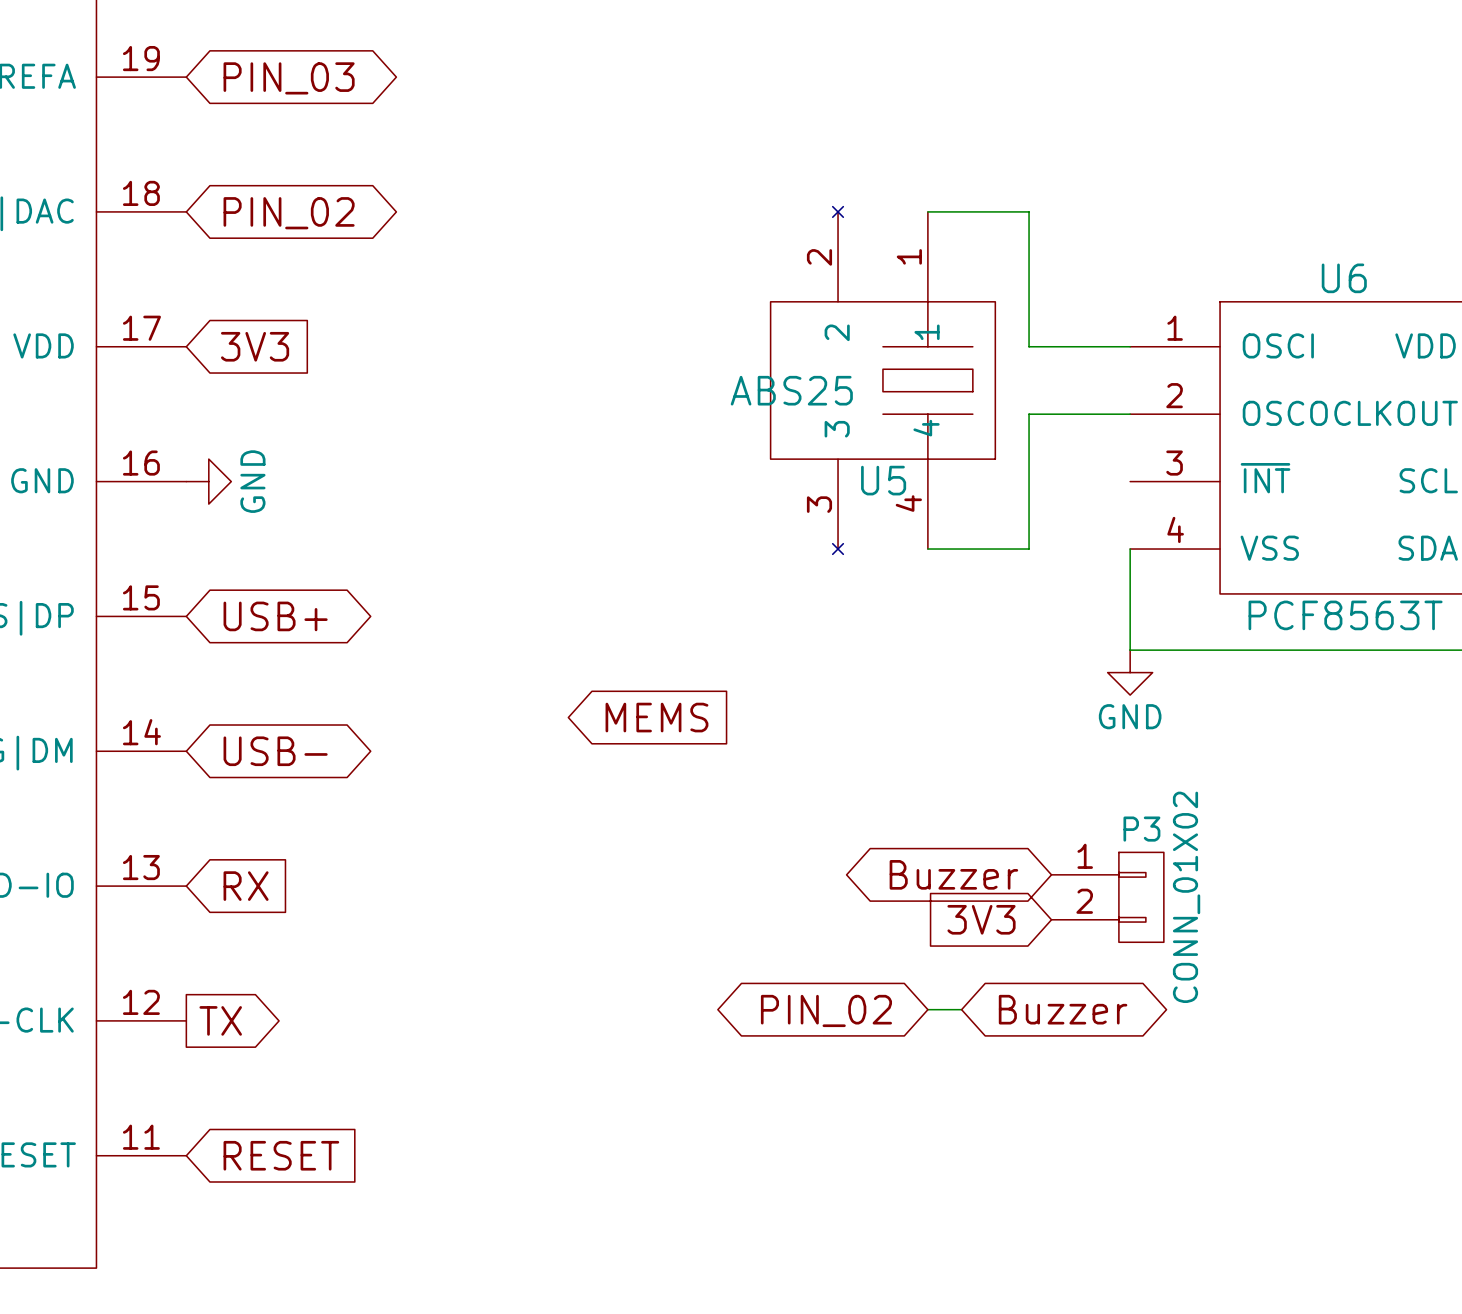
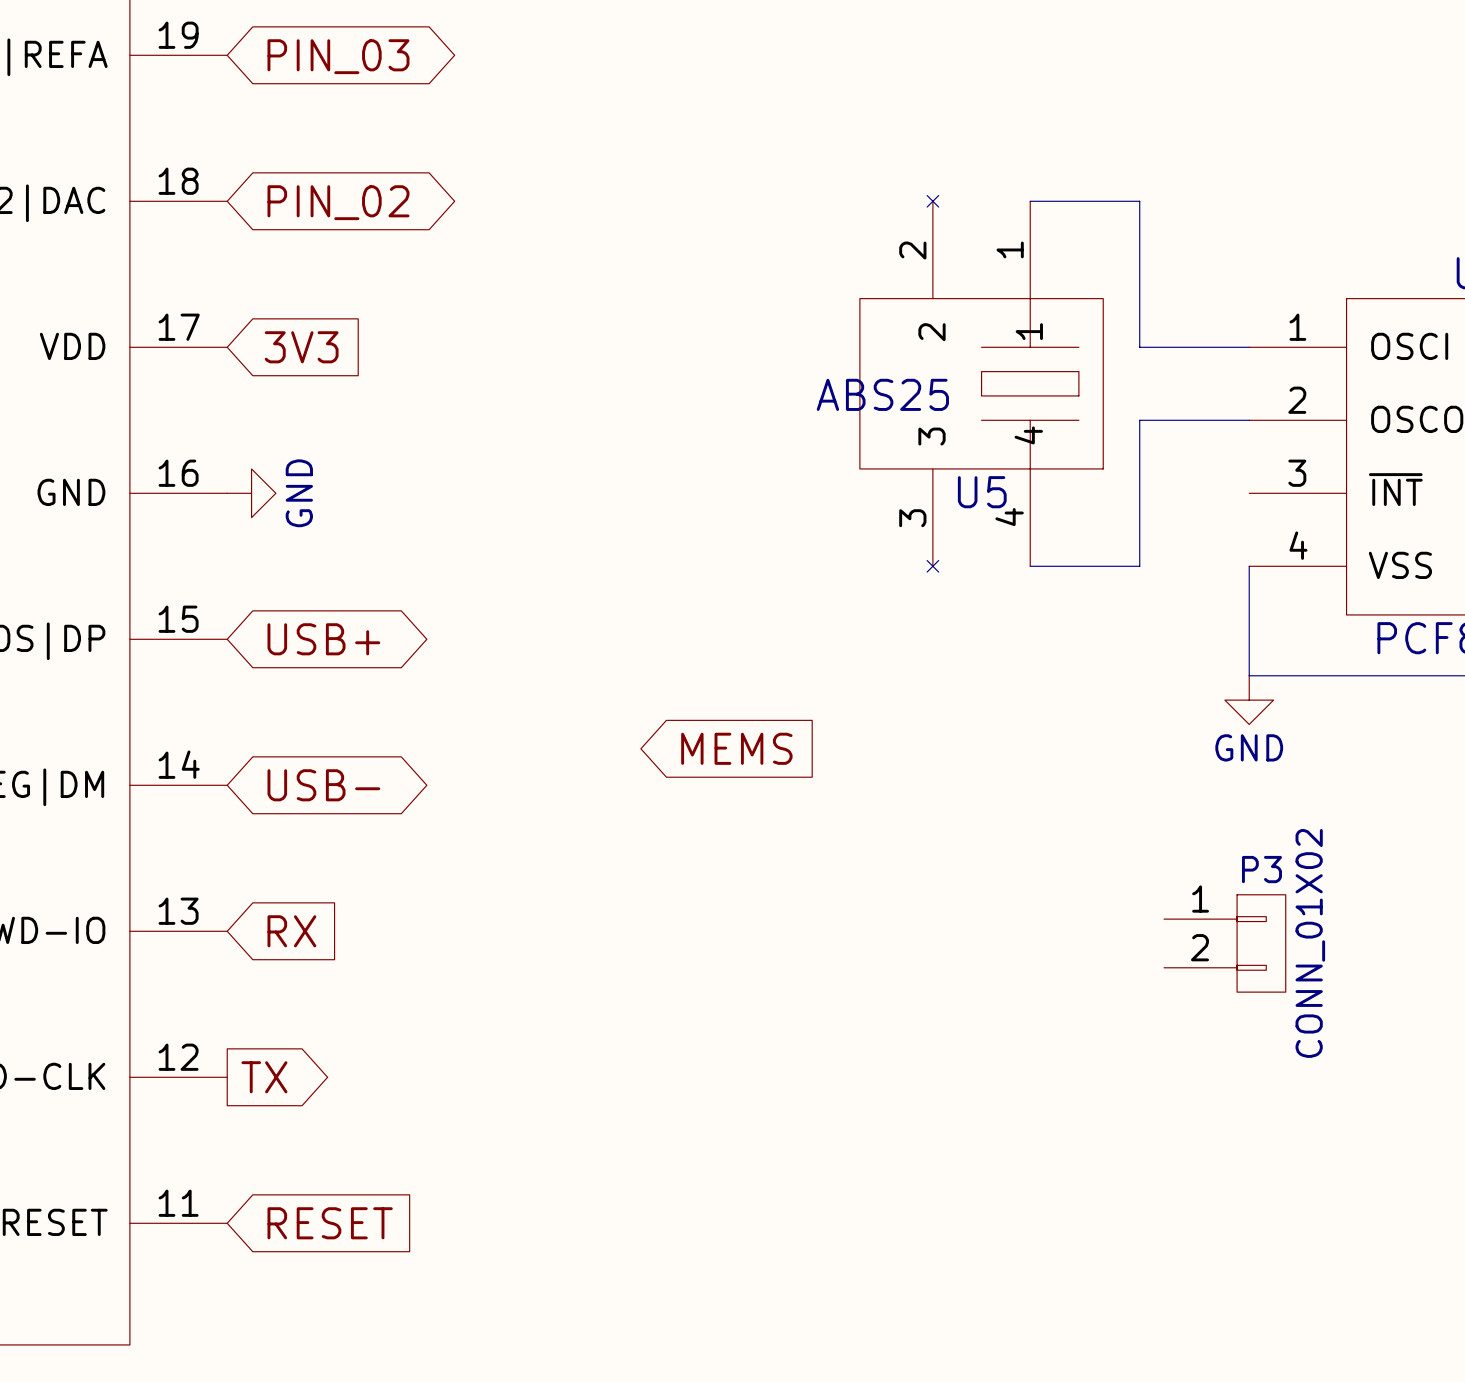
global label: Buzzer (953, 874) -> none
global label: 3V3 (981, 919) -> none
wire: (927, 1009) (961, 1009) -> none
global label: Buzzer (1063, 1009) -> none
global label: PIN_02 (826, 1010) -> none

